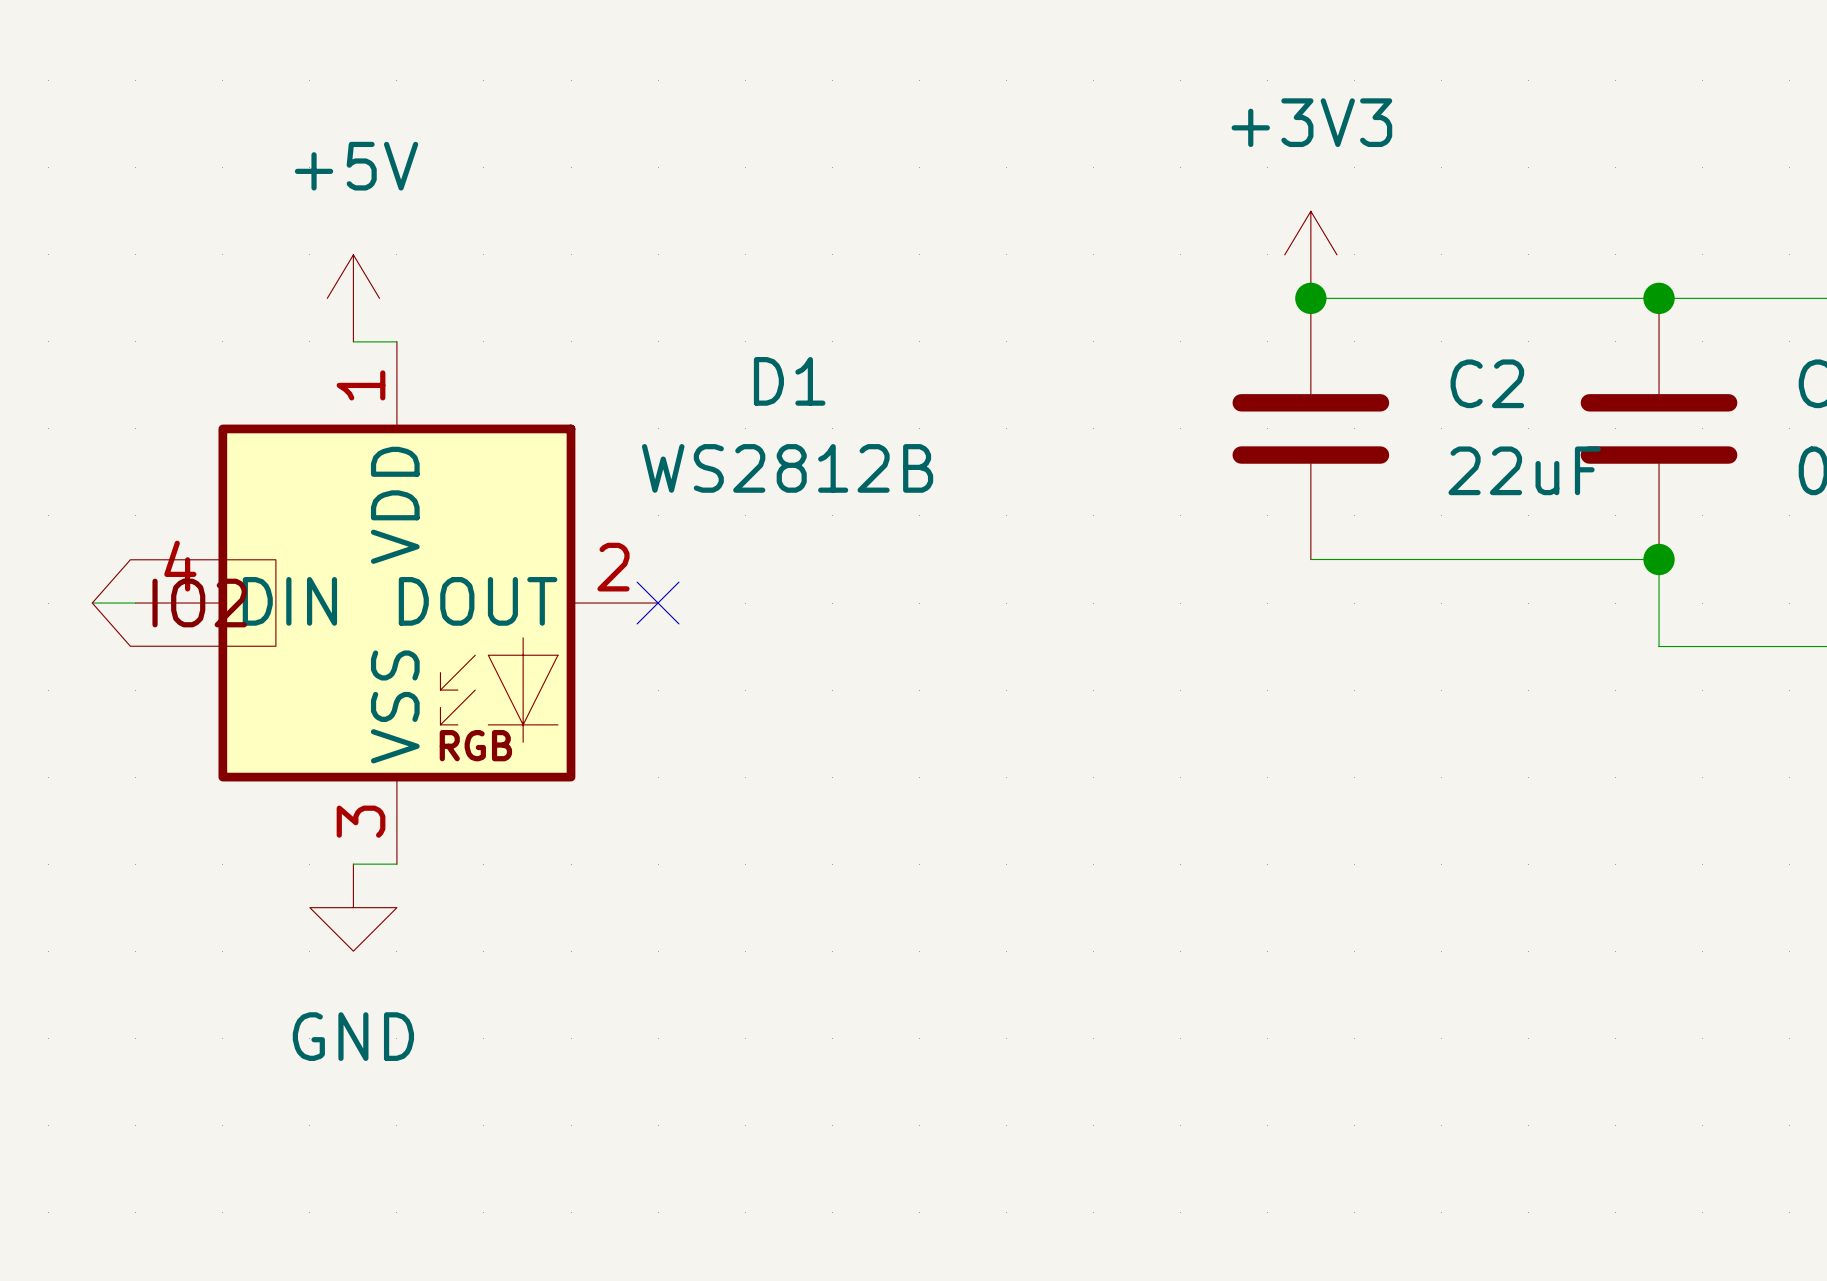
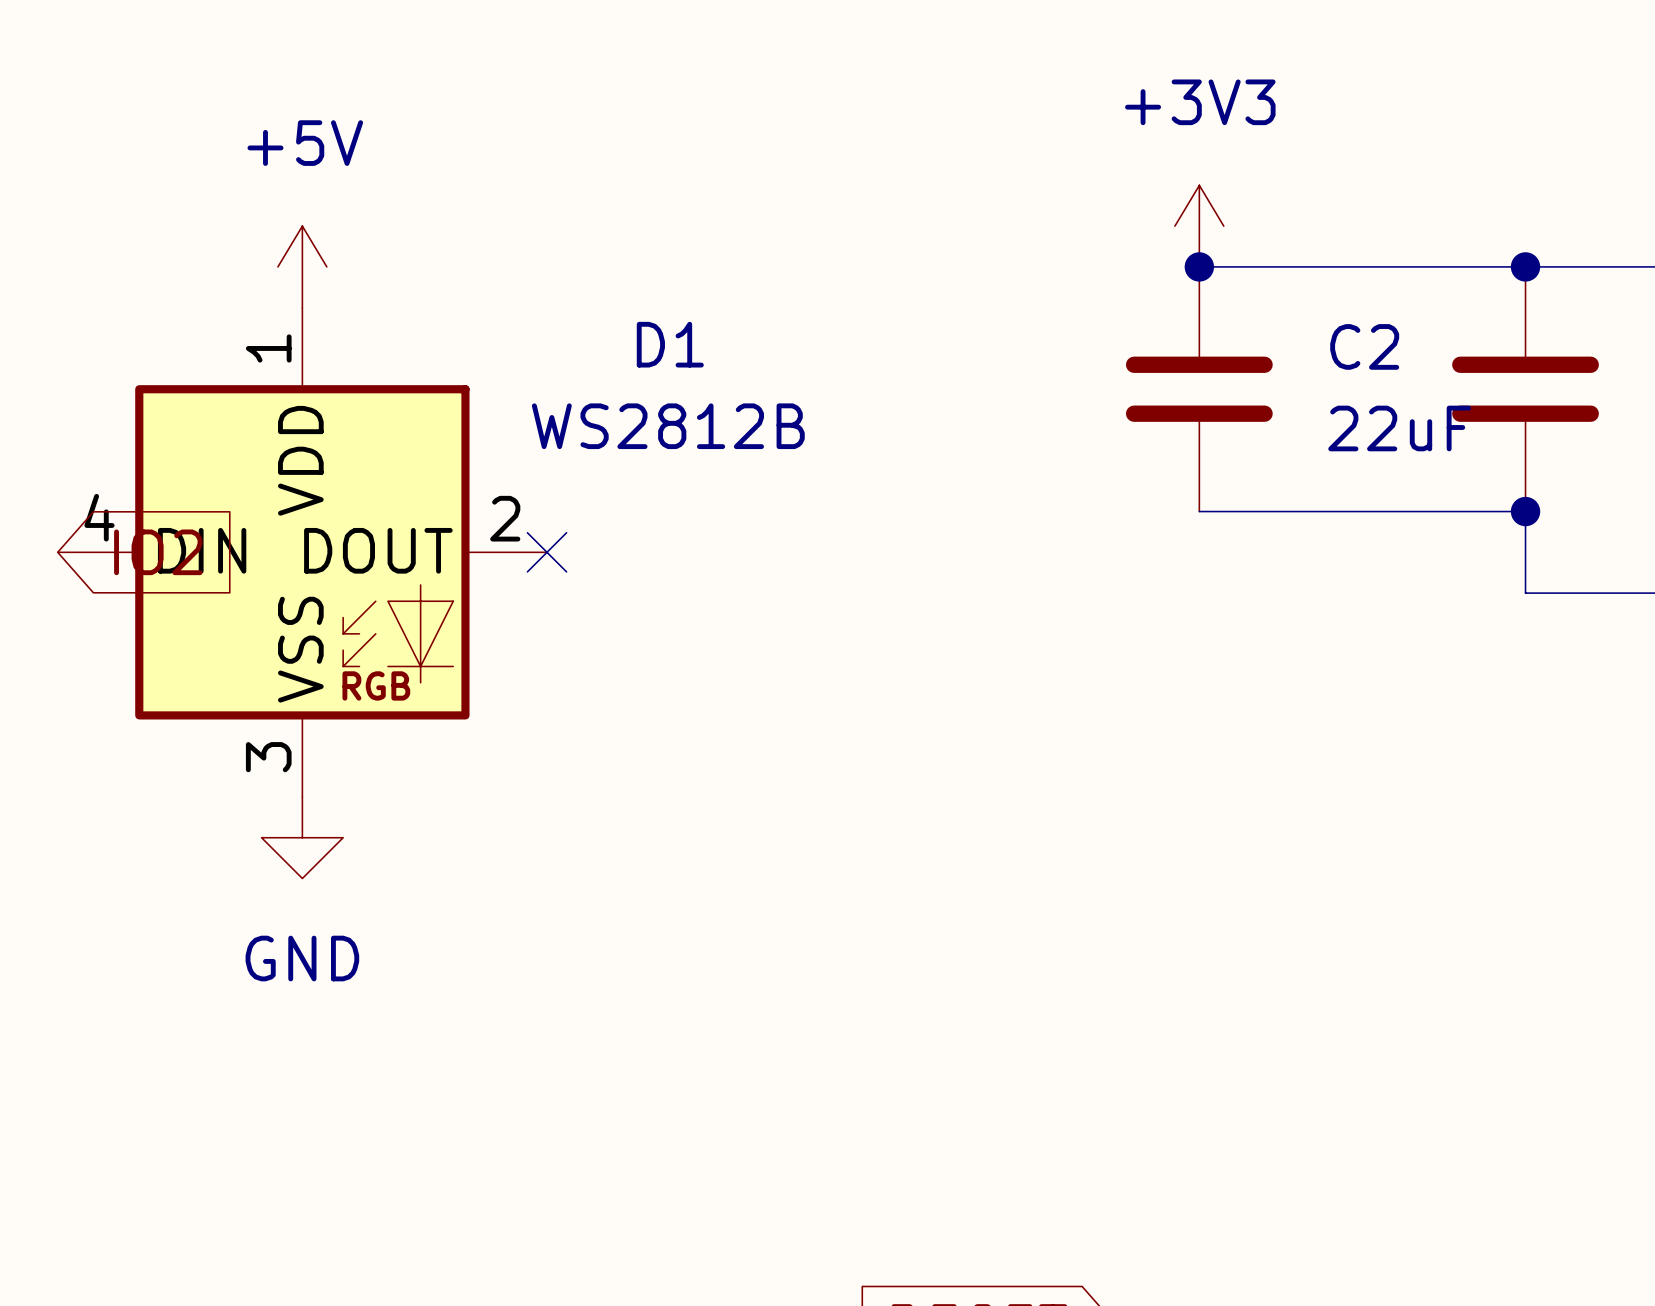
wire: (353, 341) (396, 341) -> none
D1 position: (396, 603) -> (302, 552)
no-connect mark position: (658, 603) -> (547, 552)
wire: (353, 864) (396, 864) -> none

